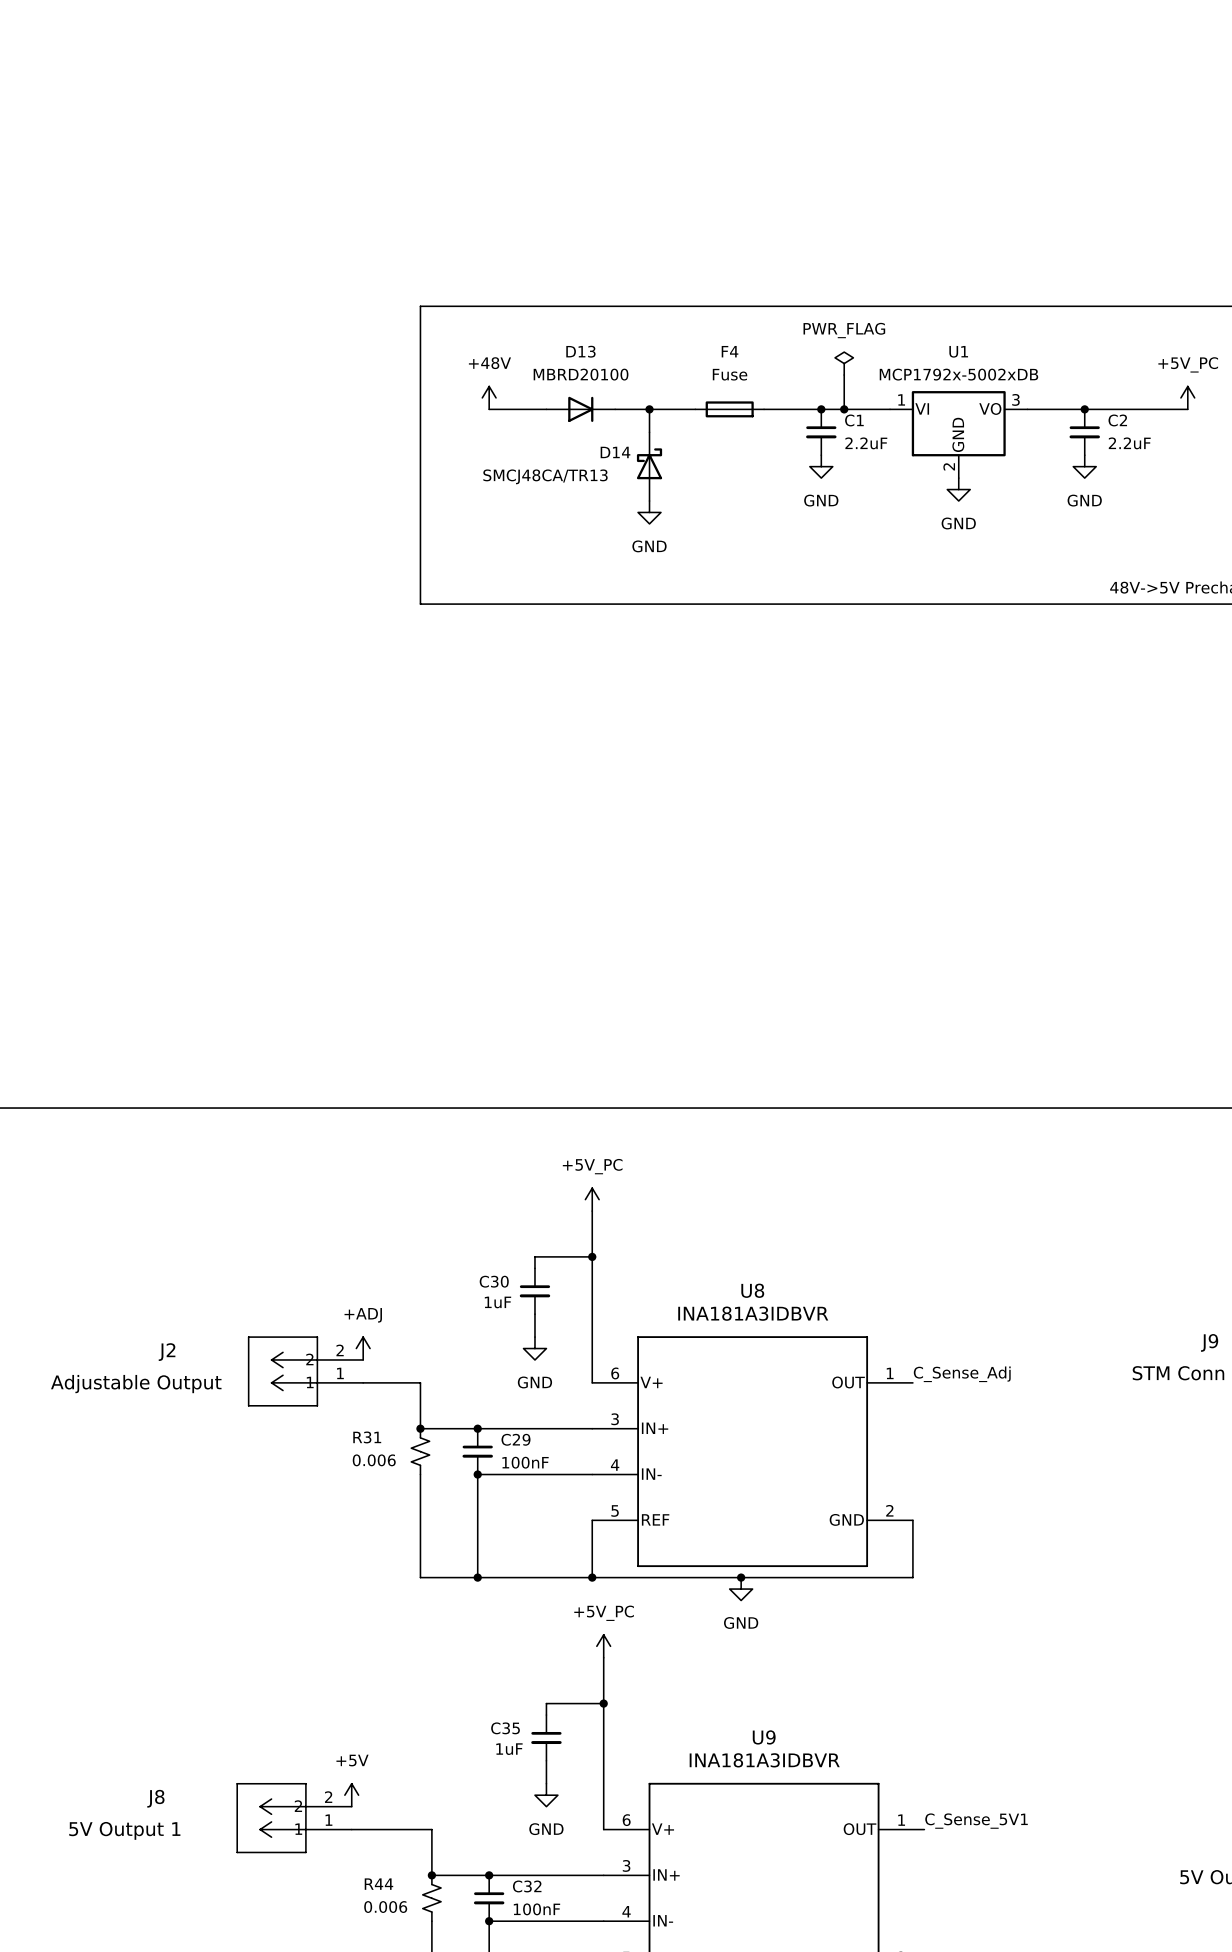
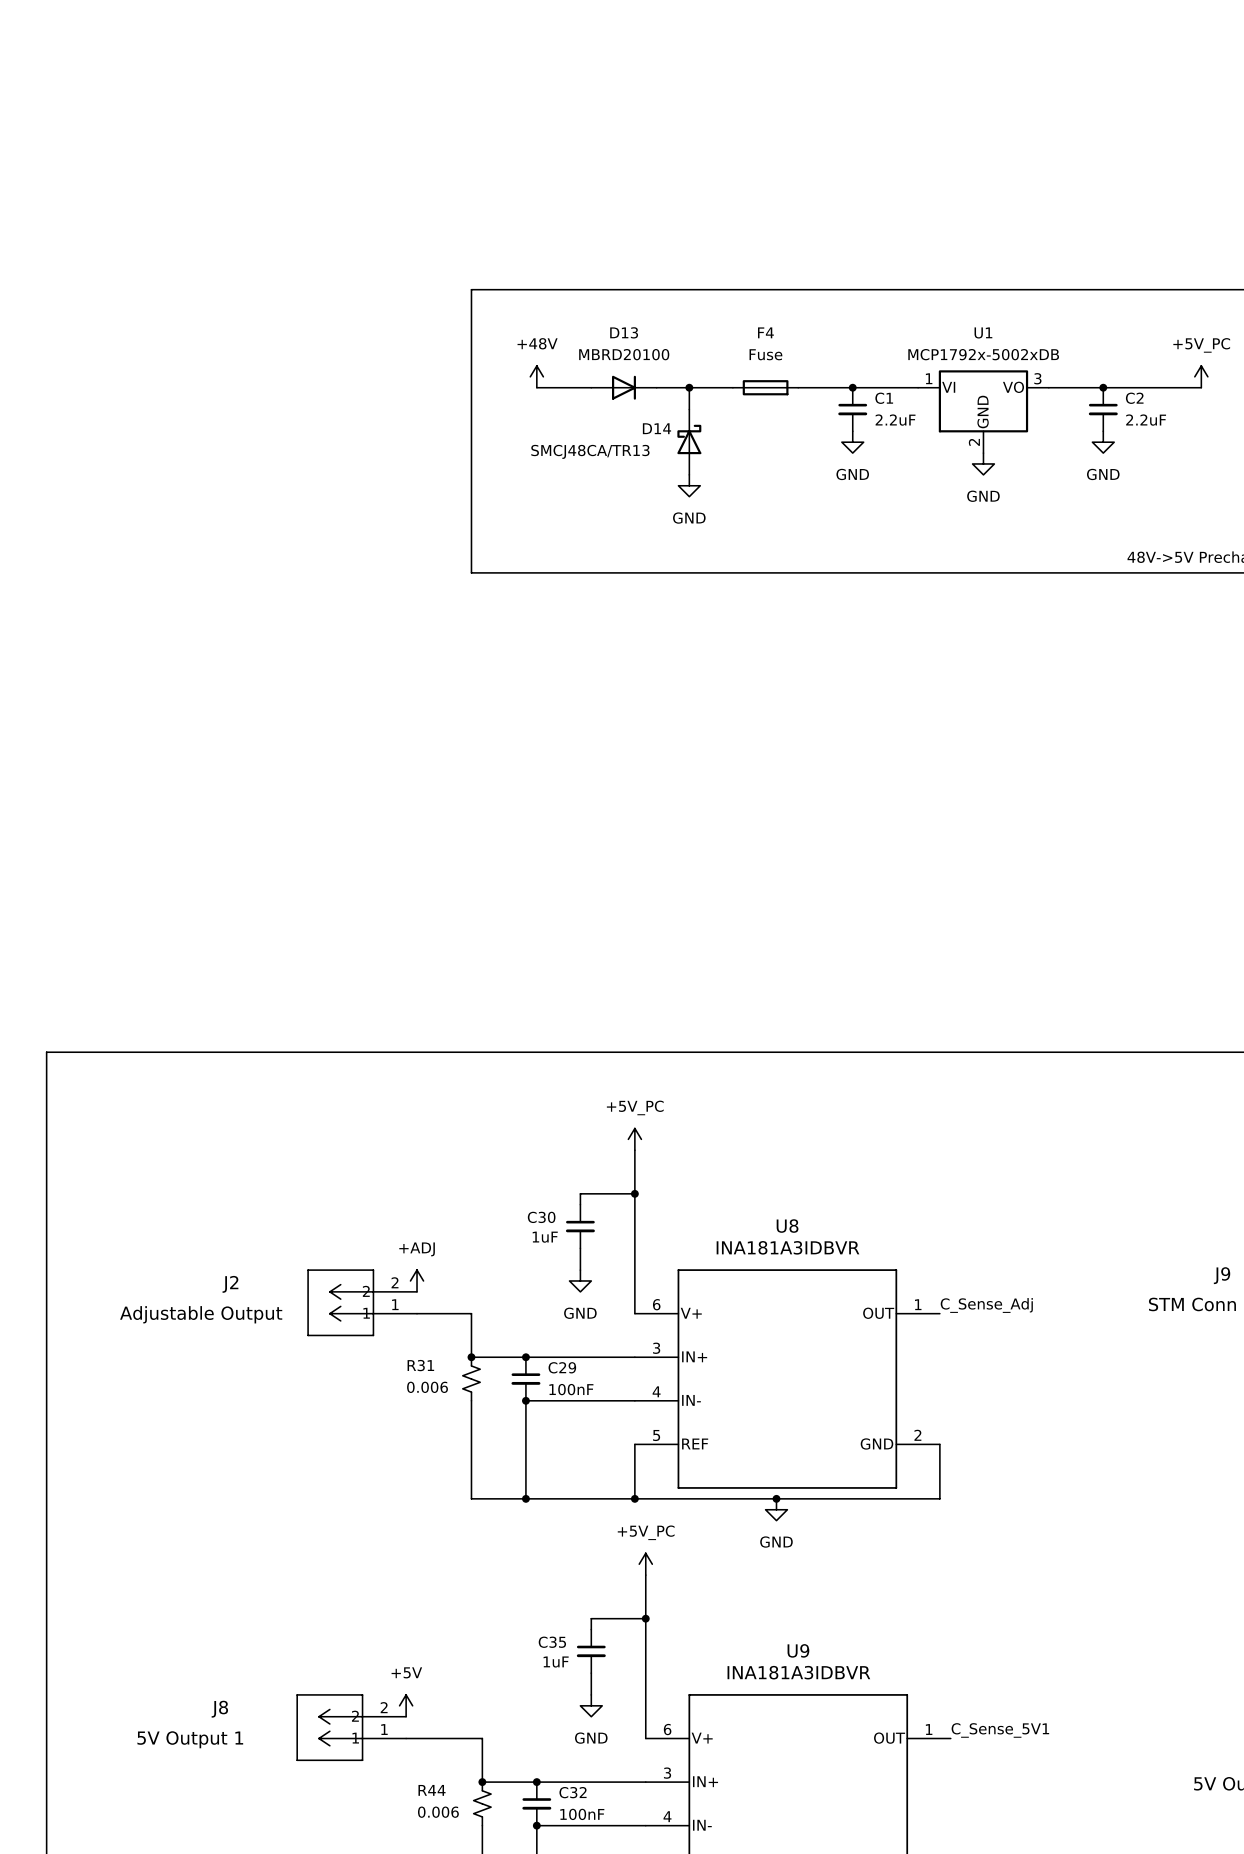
power symbol: PWR_FLAG (844, 363) -> none
wire: (844, 375) (844, 409) -> none
junction: (844, 409) -> none

